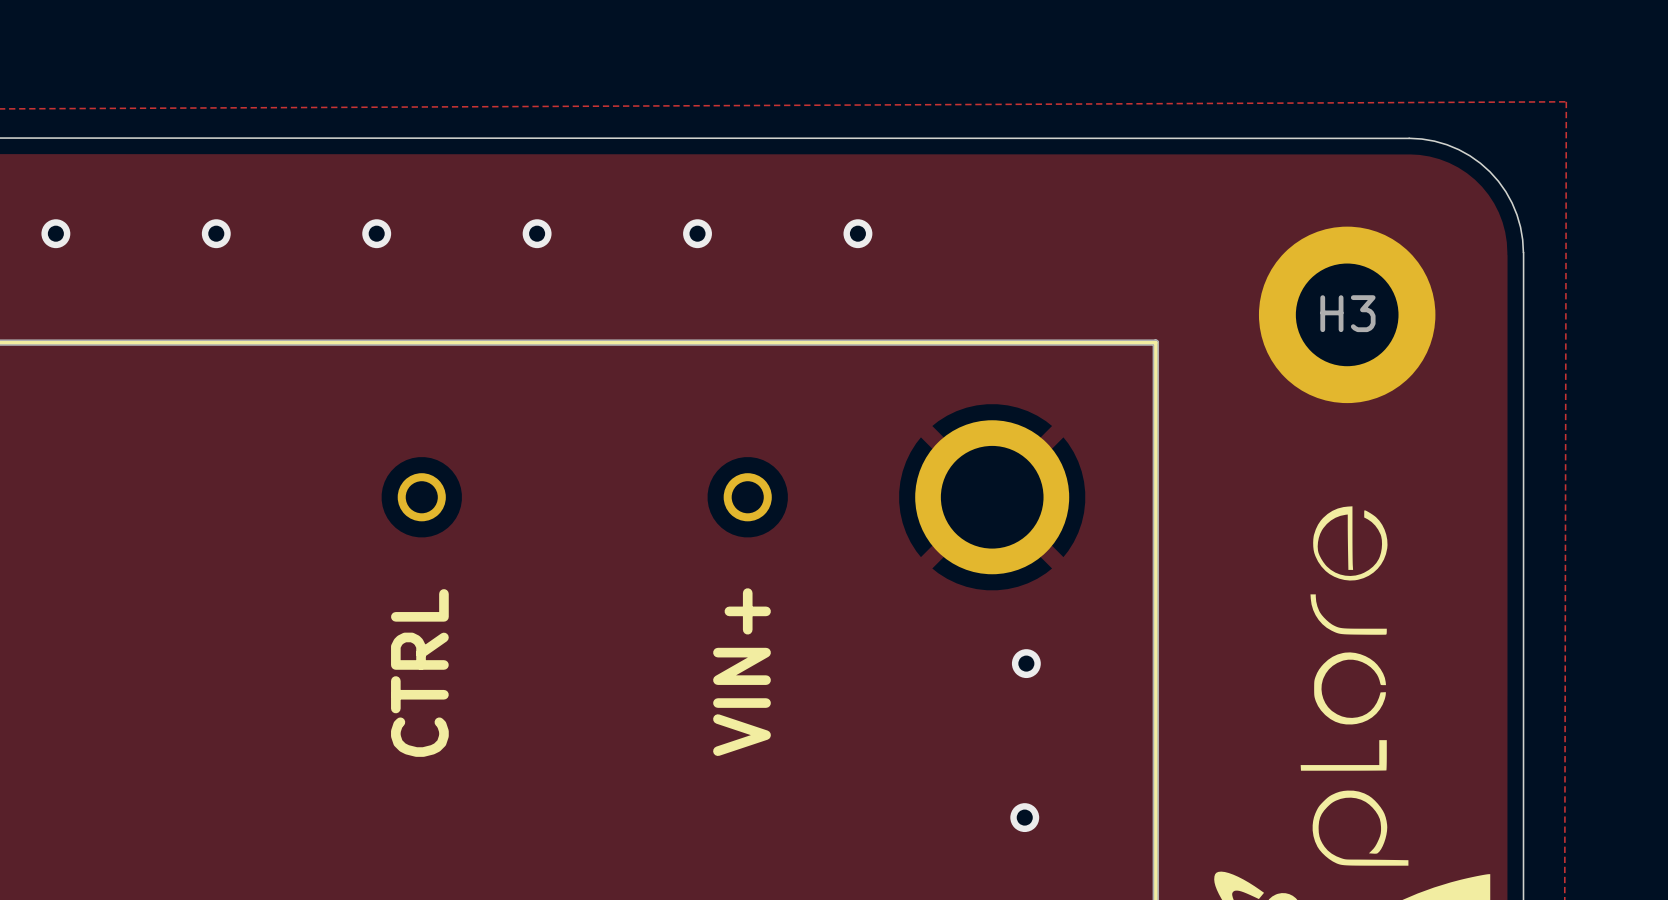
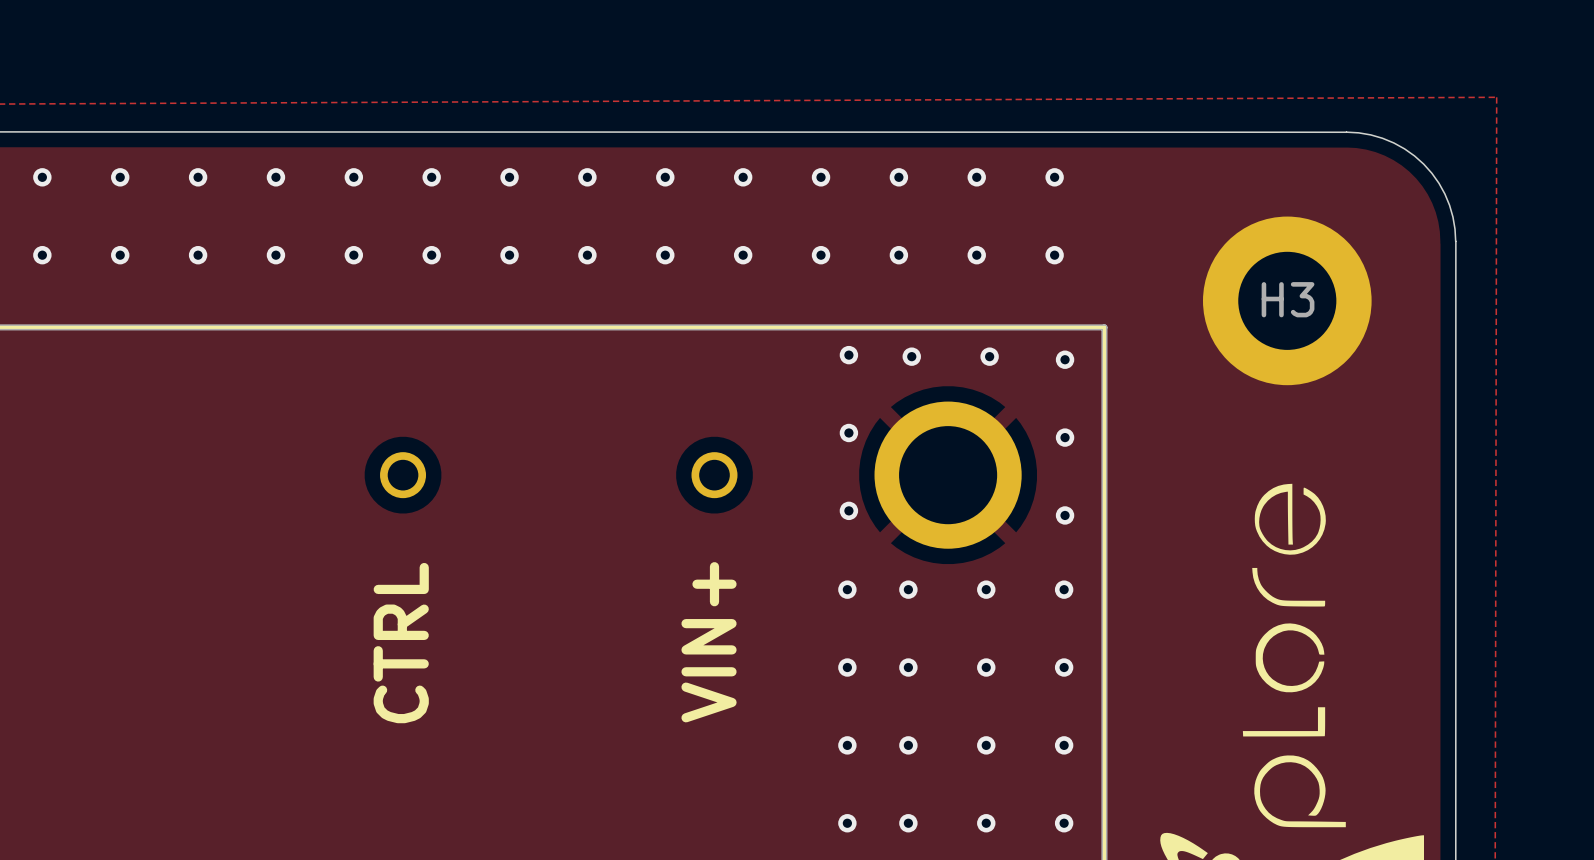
via: none -> (42, 177)
via: none -> (120, 177)
via: none -> (198, 177)
via: none -> (275, 177)
via: none -> (353, 177)
via: none -> (431, 177)
via: none -> (509, 177)
via: none -> (587, 177)
via: none -> (665, 177)
via: none -> (743, 177)
via: none -> (821, 177)
via: none -> (898, 177)
via: none -> (976, 177)
via: none -> (1054, 177)
via: (55, 233) -> none
via: (216, 233) -> none
via: (376, 233) -> none
via: (537, 233) -> none
via: (697, 233) -> none
via: (857, 233) -> none
via: none -> (42, 255)
via: none -> (120, 255)
via: none -> (198, 255)
via: none -> (275, 255)
via: none -> (353, 255)
via: none -> (431, 255)
via: none -> (509, 255)
via: none -> (587, 255)
via: none -> (665, 255)
via: none -> (743, 255)
via: none -> (821, 255)
via: none -> (898, 255)
via: none -> (976, 255)
via: none -> (1054, 255)
via: none -> (848, 355)
via: none -> (911, 356)
via: none -> (989, 356)
via: none -> (1065, 359)
via: none -> (848, 432)
via: none -> (1065, 437)
via: none -> (848, 510)
via: none -> (1065, 515)
via: none -> (847, 589)
via: none -> (908, 589)
via: none -> (986, 589)
via: none -> (1064, 589)
via: (1026, 663) -> none
via: none -> (847, 667)
via: none -> (908, 667)
via: none -> (986, 667)
via: none -> (1064, 667)
via: none -> (847, 745)
via: none -> (908, 745)
via: none -> (986, 745)
via: none -> (1064, 745)
via: (1024, 817) -> none
via: none -> (847, 823)
via: none -> (908, 823)
via: none -> (986, 823)
via: none -> (1064, 823)

